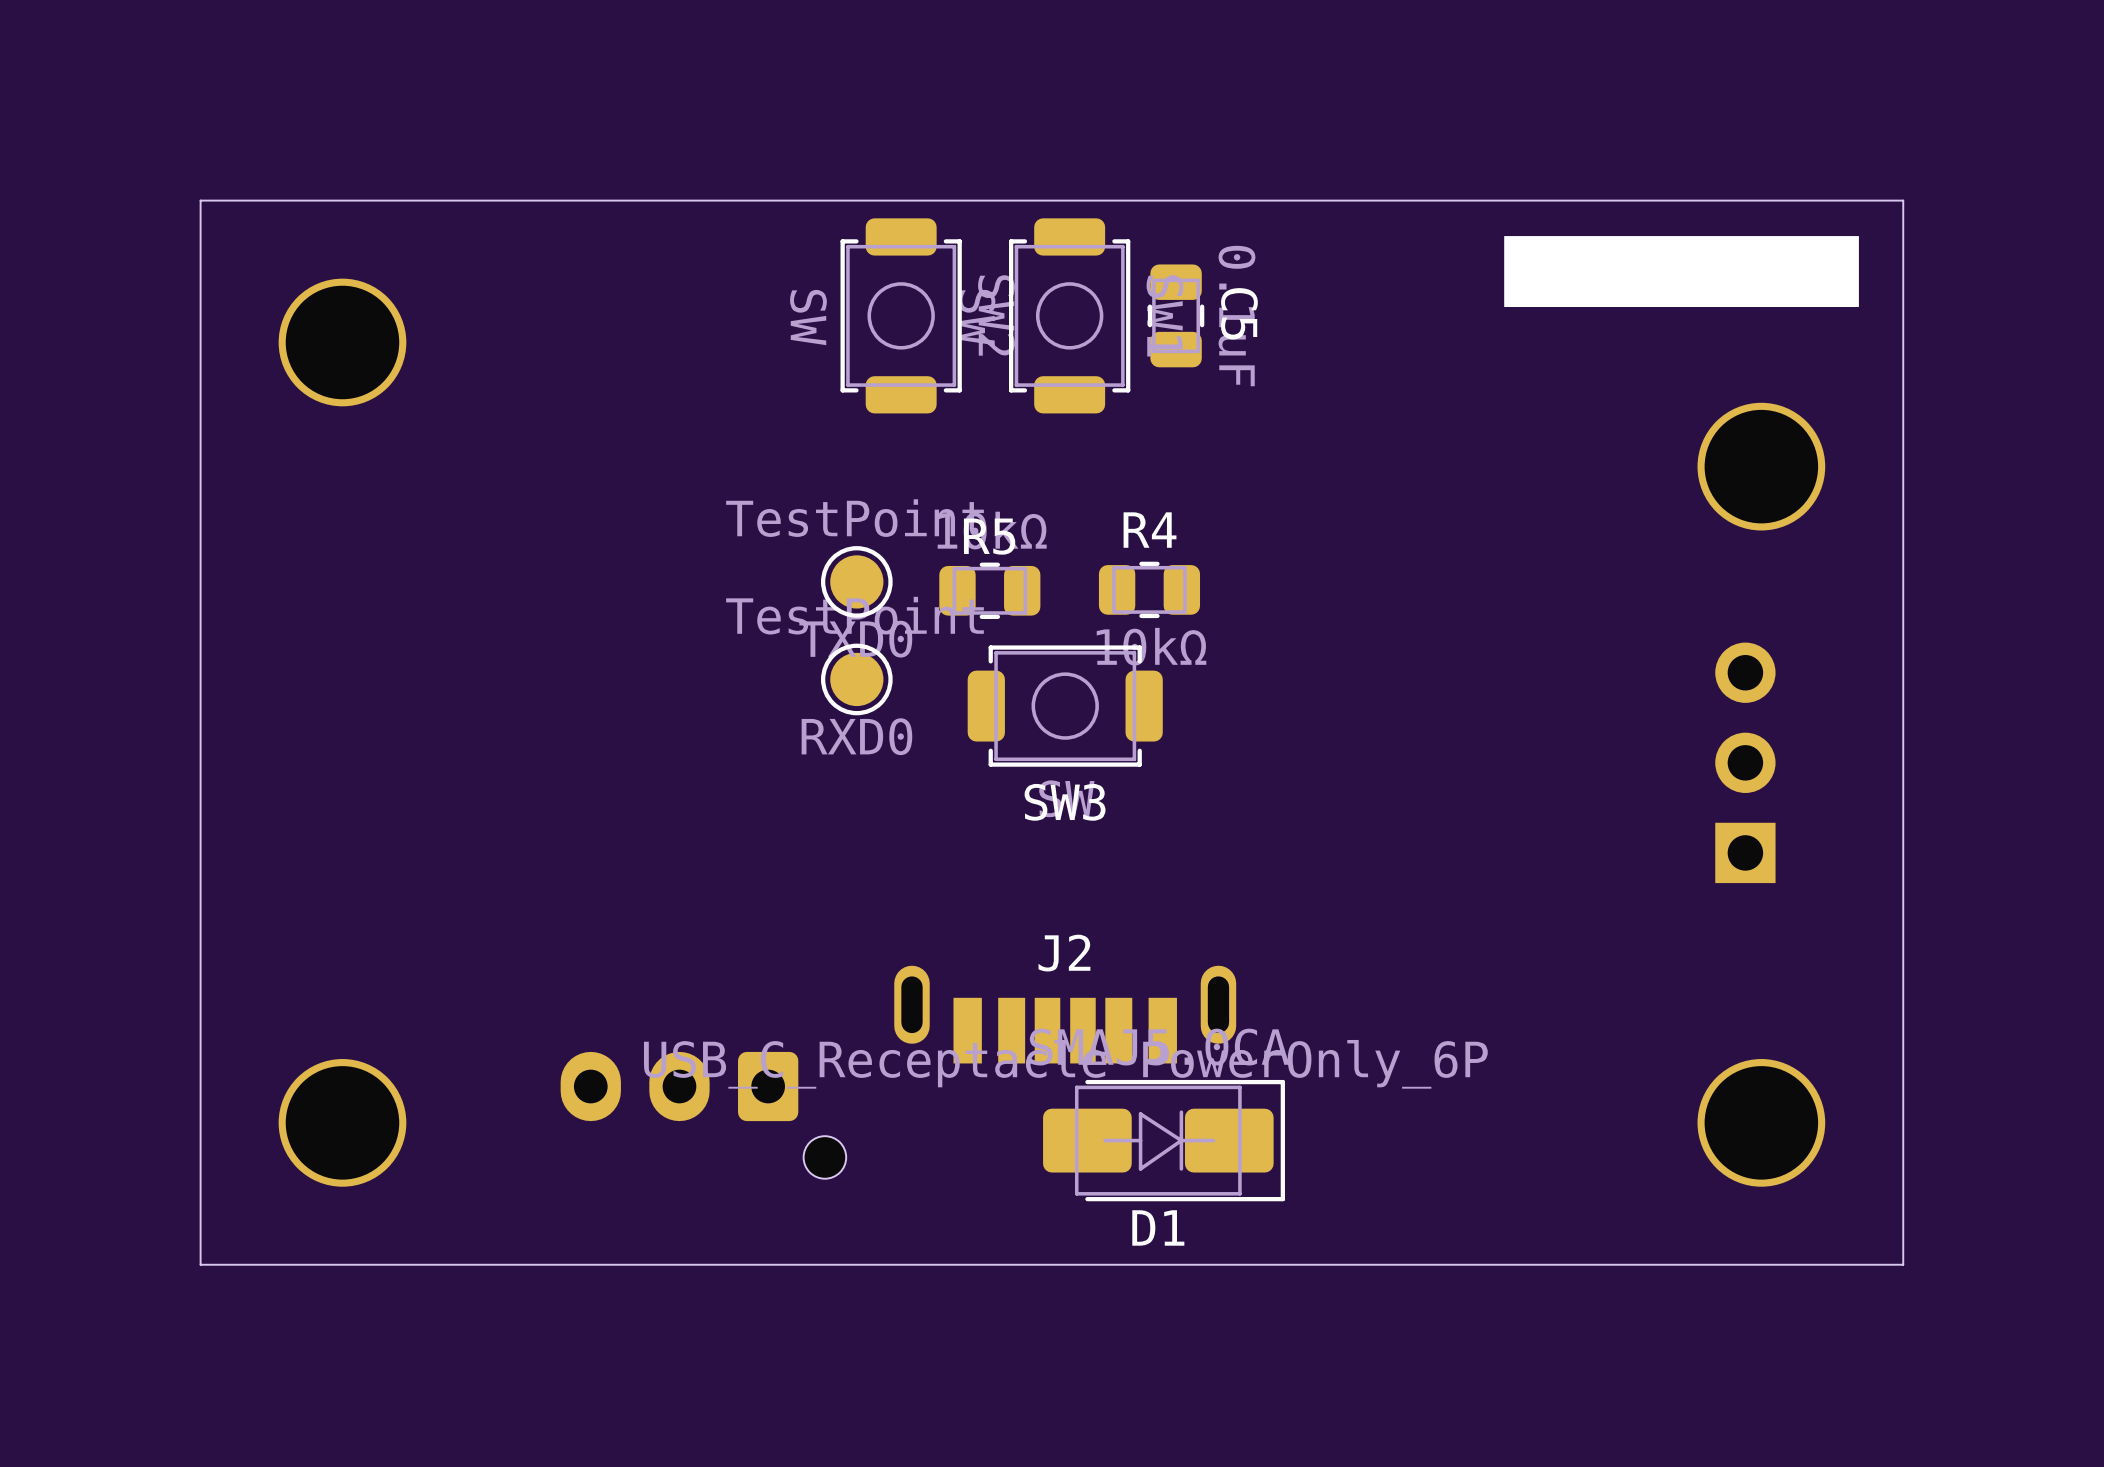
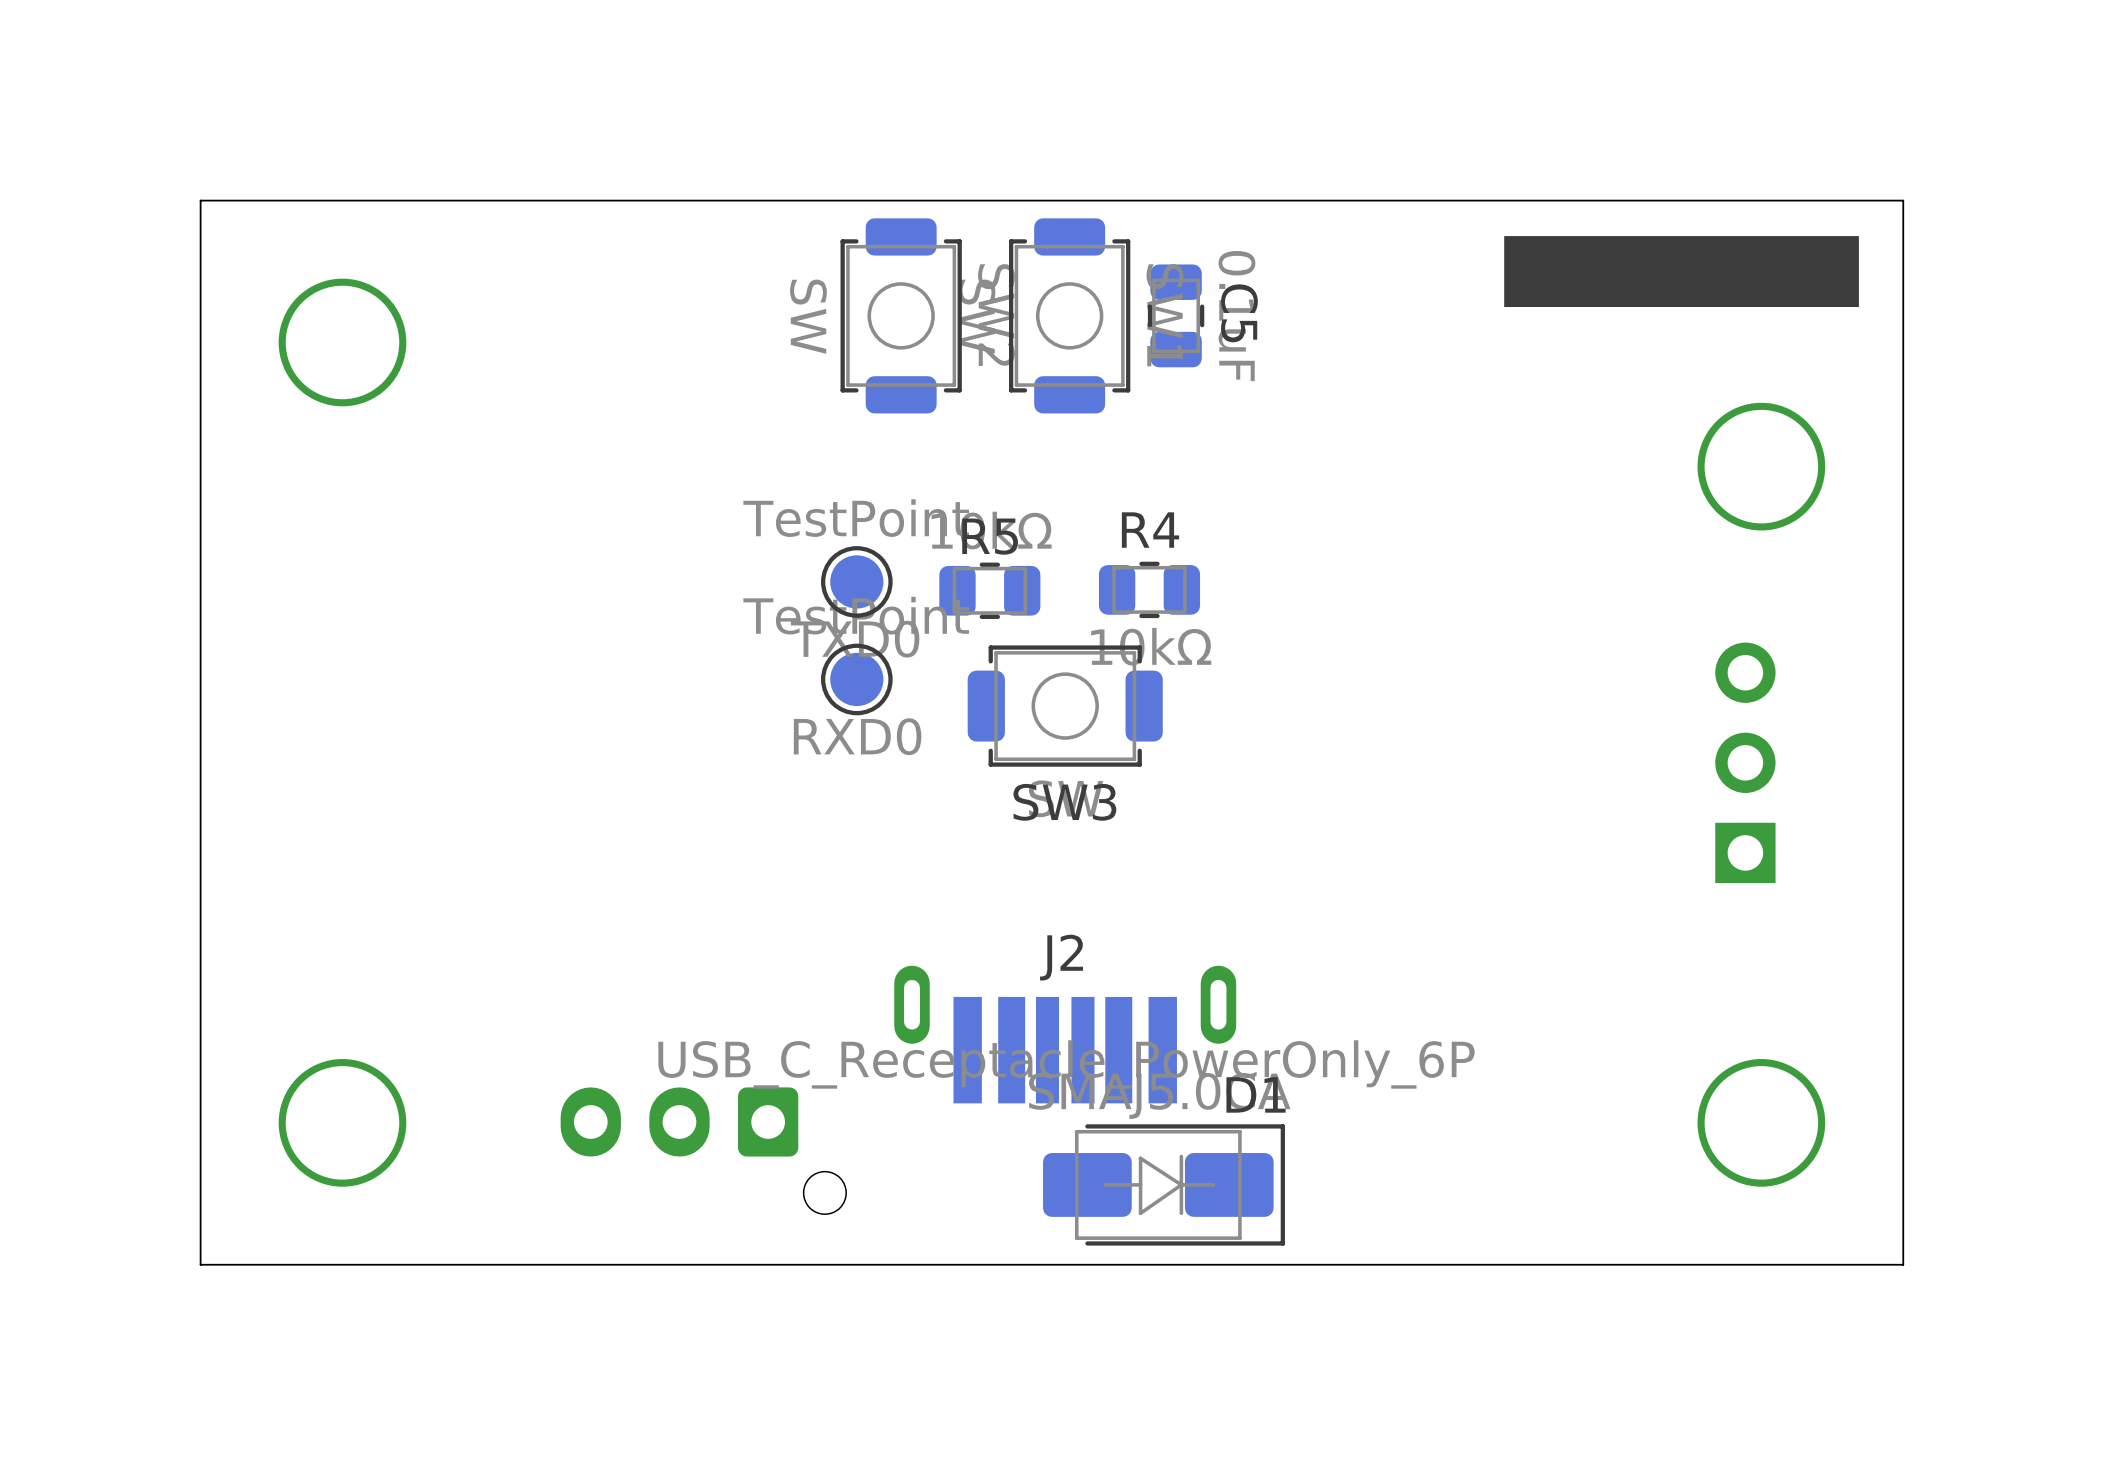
J2 footprint: [894, 965, 1237, 1064] -> [894, 965, 1237, 1104]
part position: (703, 1115) -> (703, 1150)
D1 position: (1164, 1140) -> (1164, 1184)
D1 name position: D1 (1158, 1227) -> D1 (1256, 1094)

